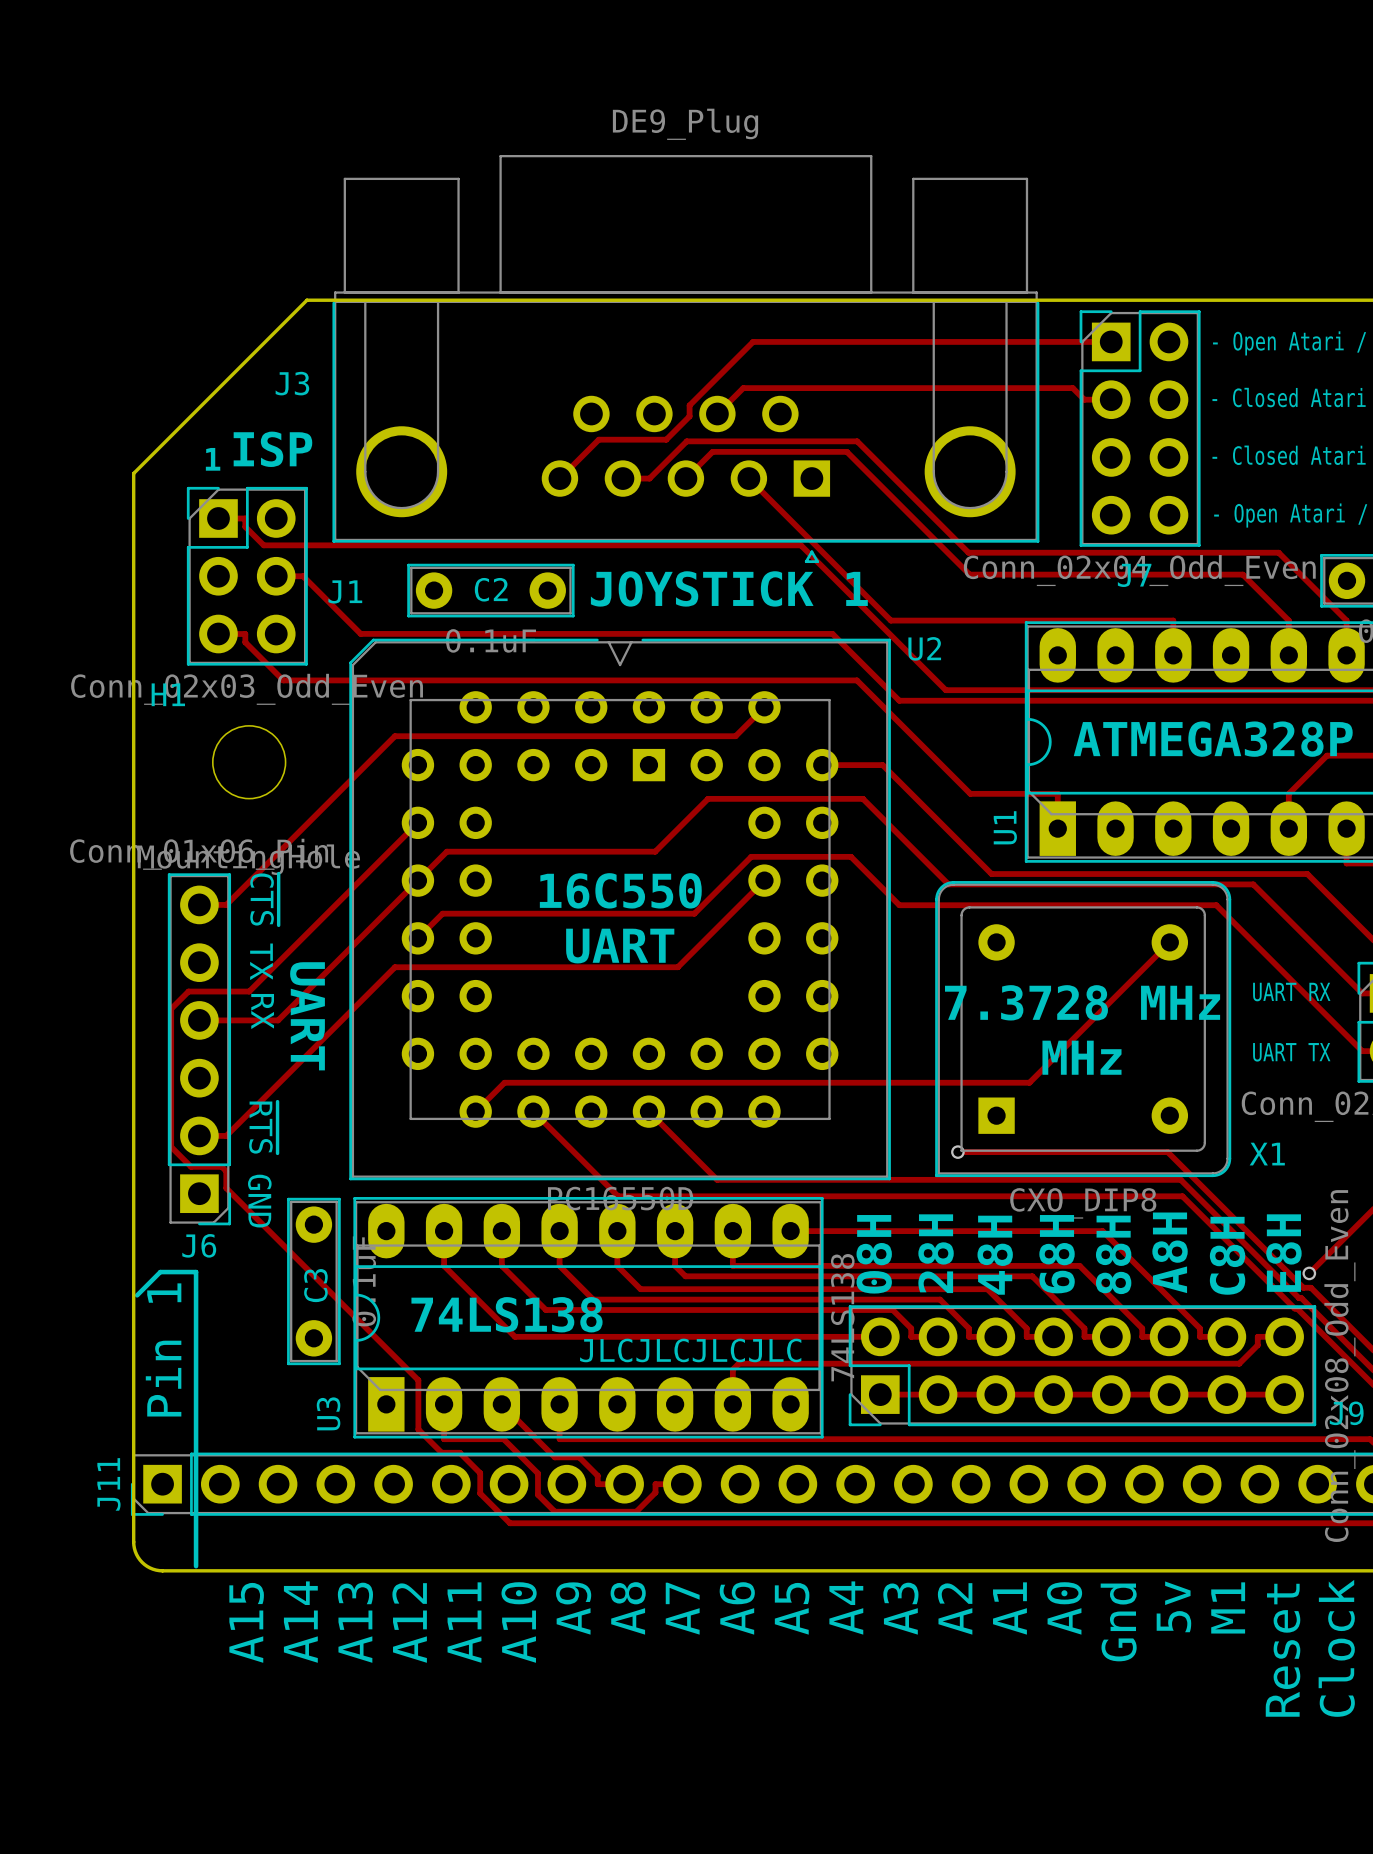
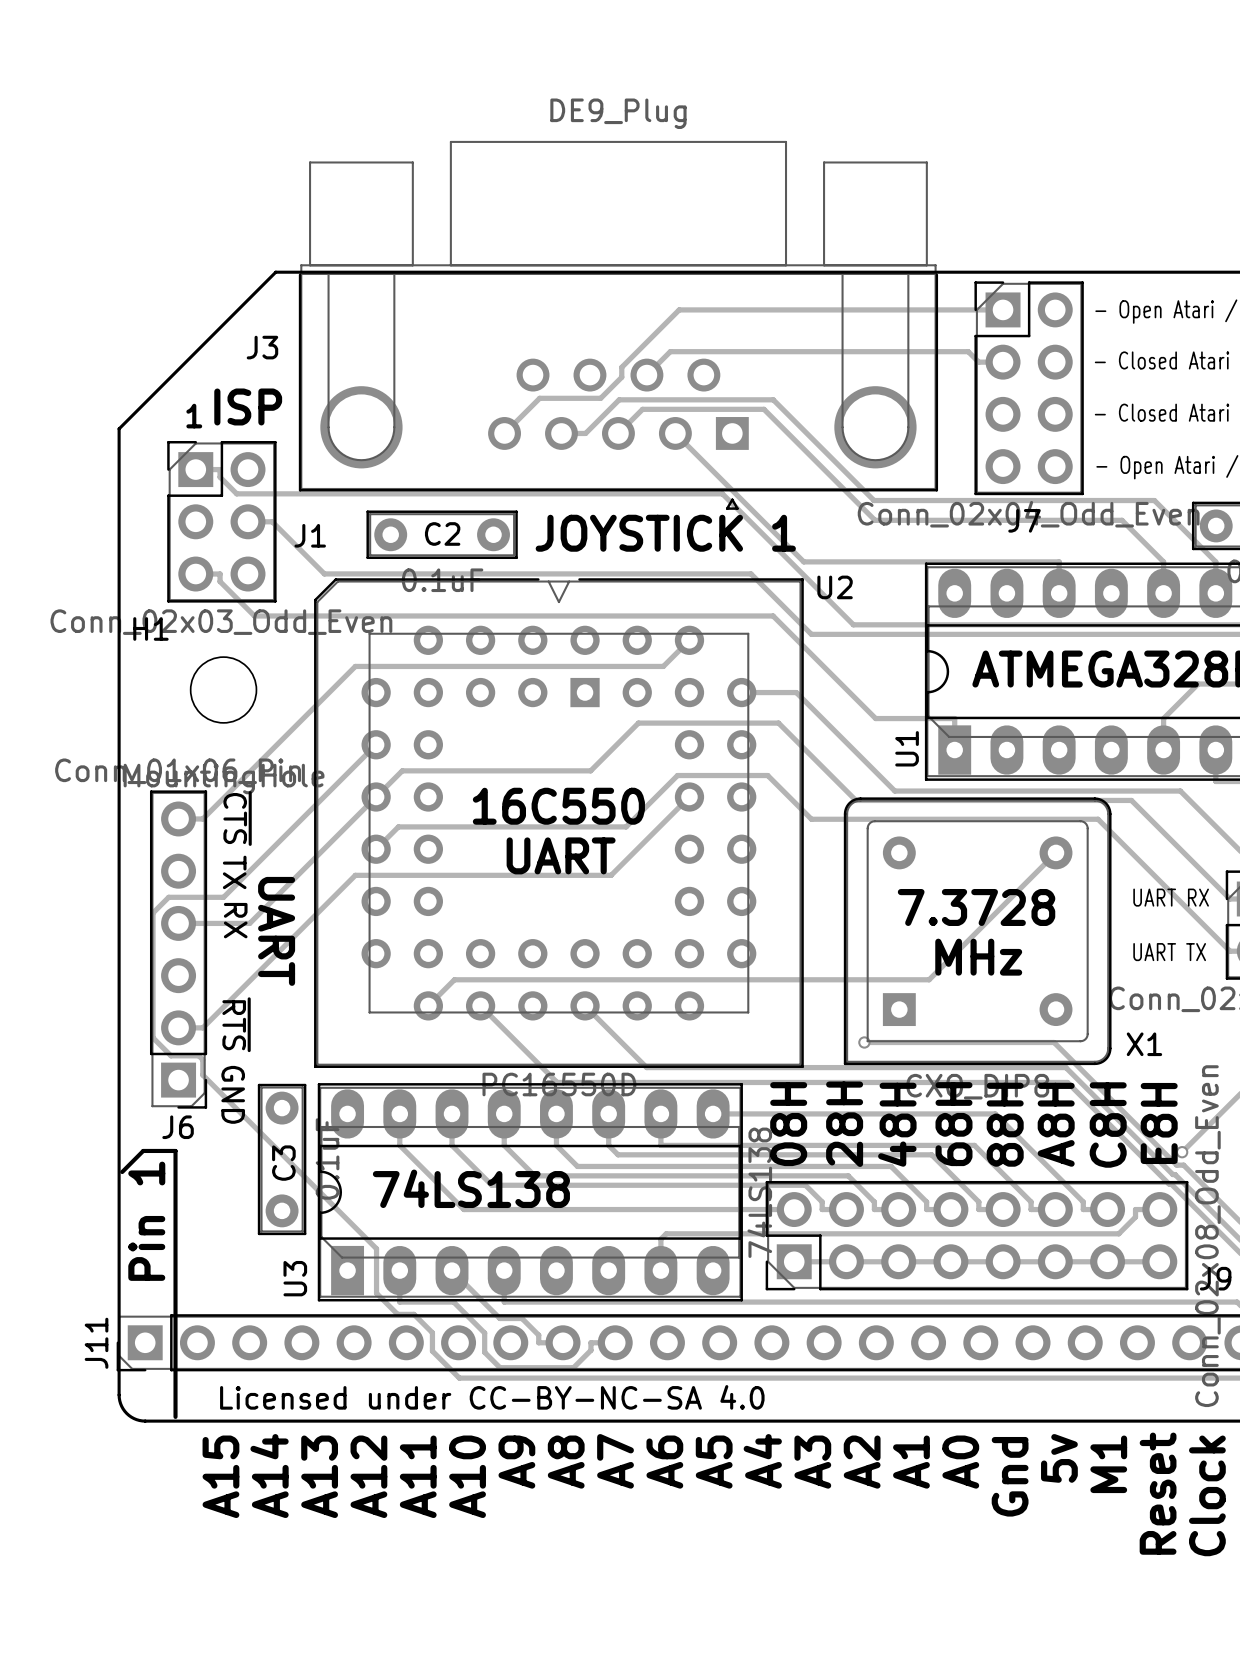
text: 7.3728 MHz (1082, 1002) -> 7.3728 (976, 907)
text: JLCJLCJLCJLC (690, 1350) -> none
text: none -> Licensed under CC-BY-NC-SA 4.0 (492, 1397)

